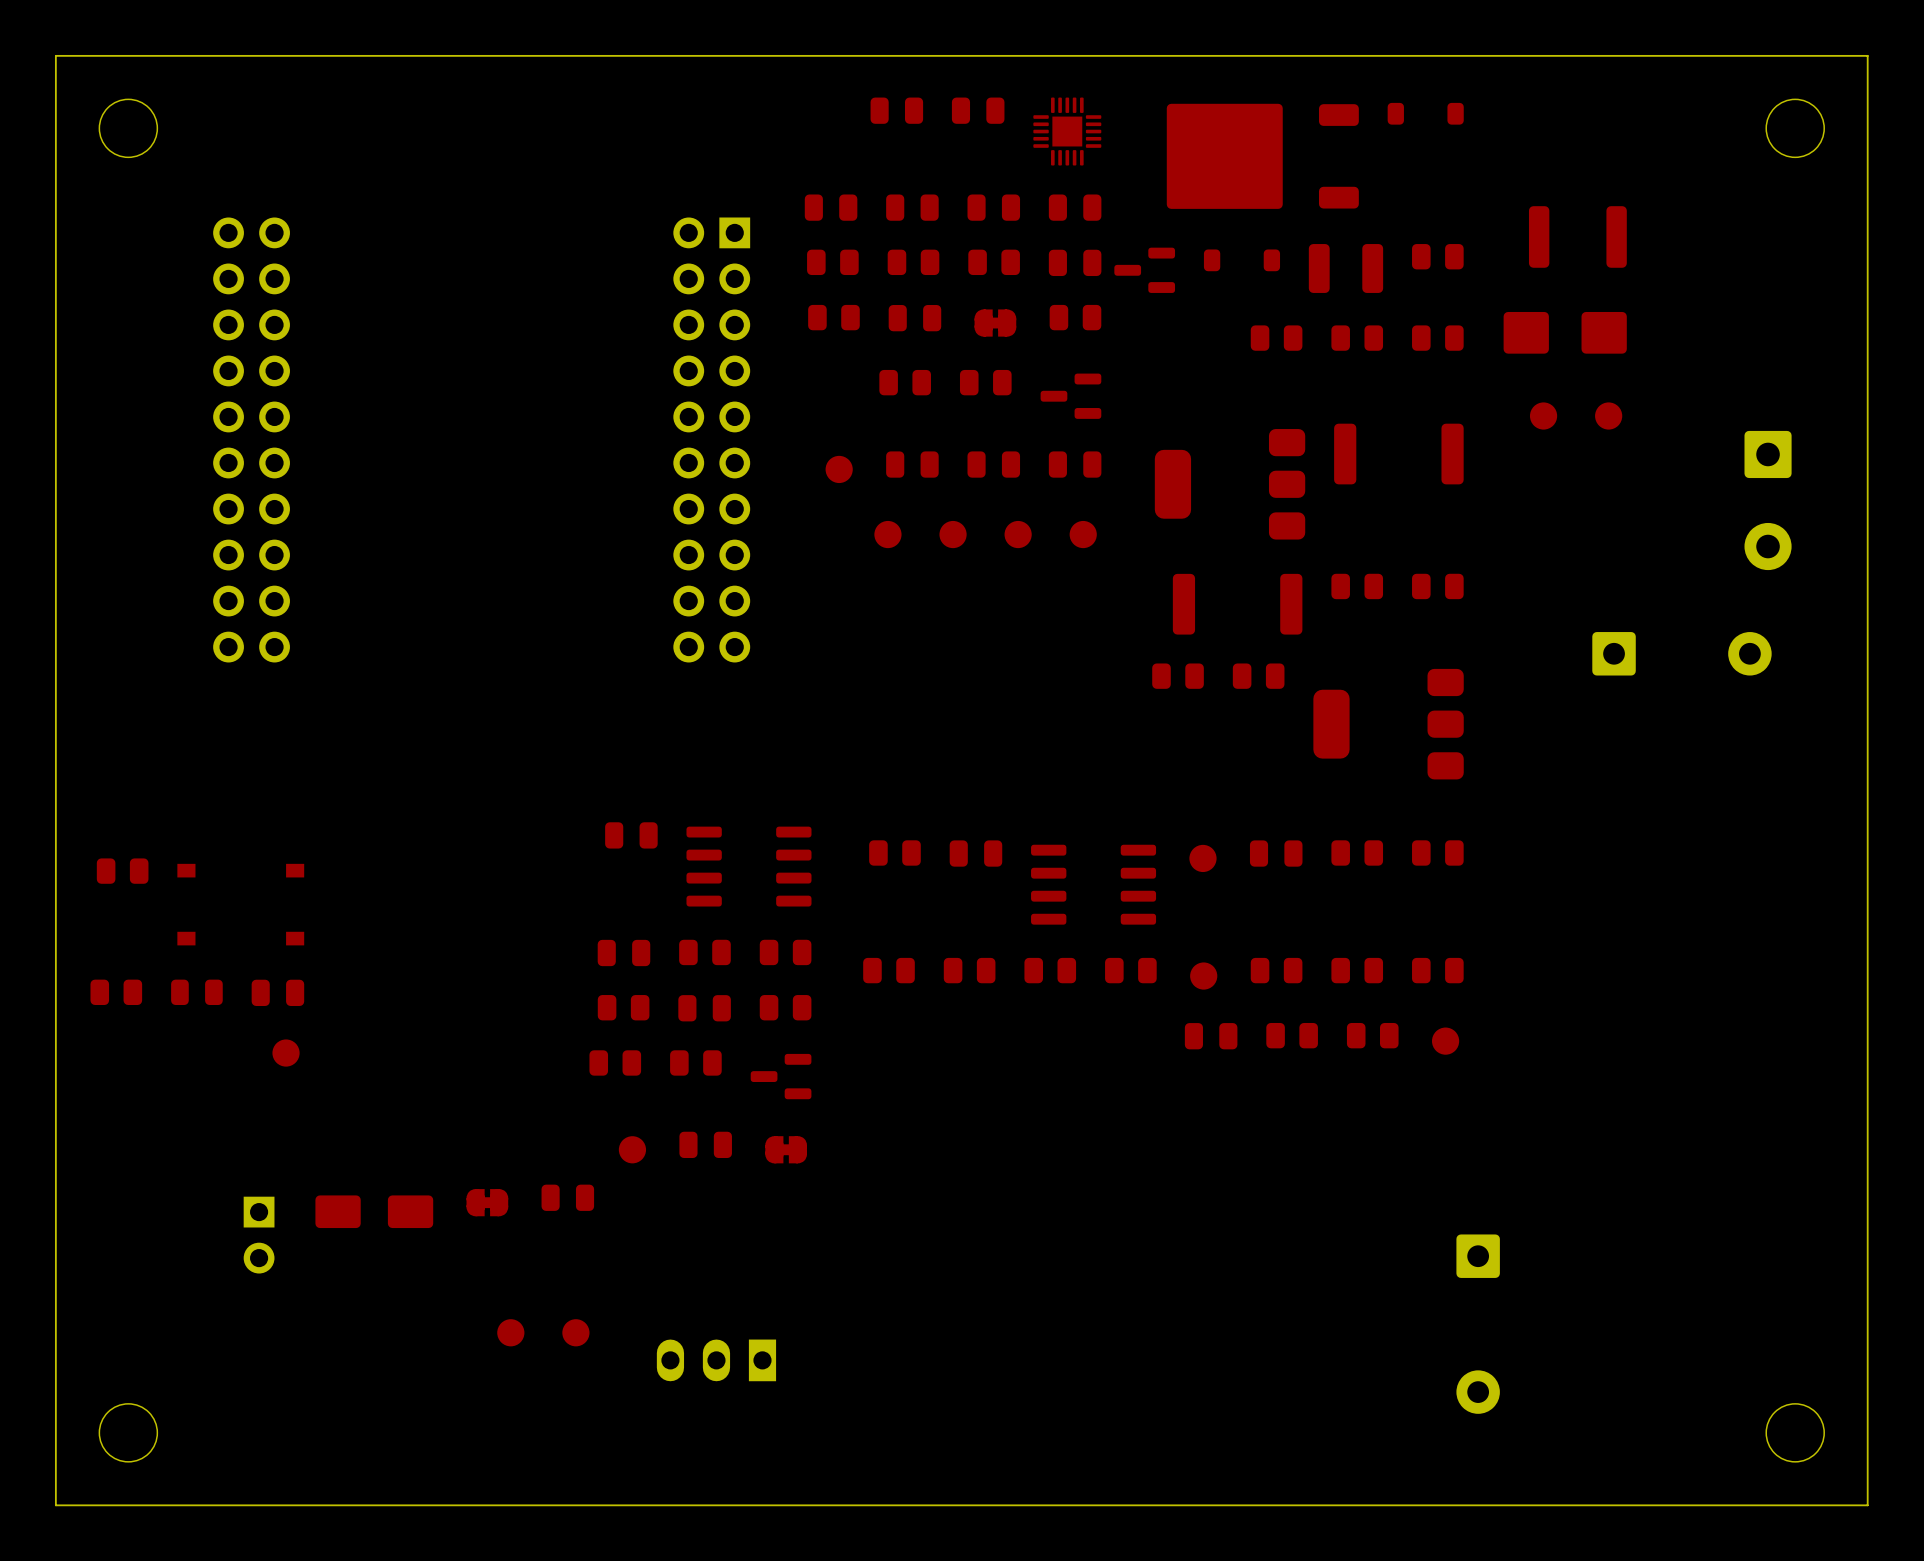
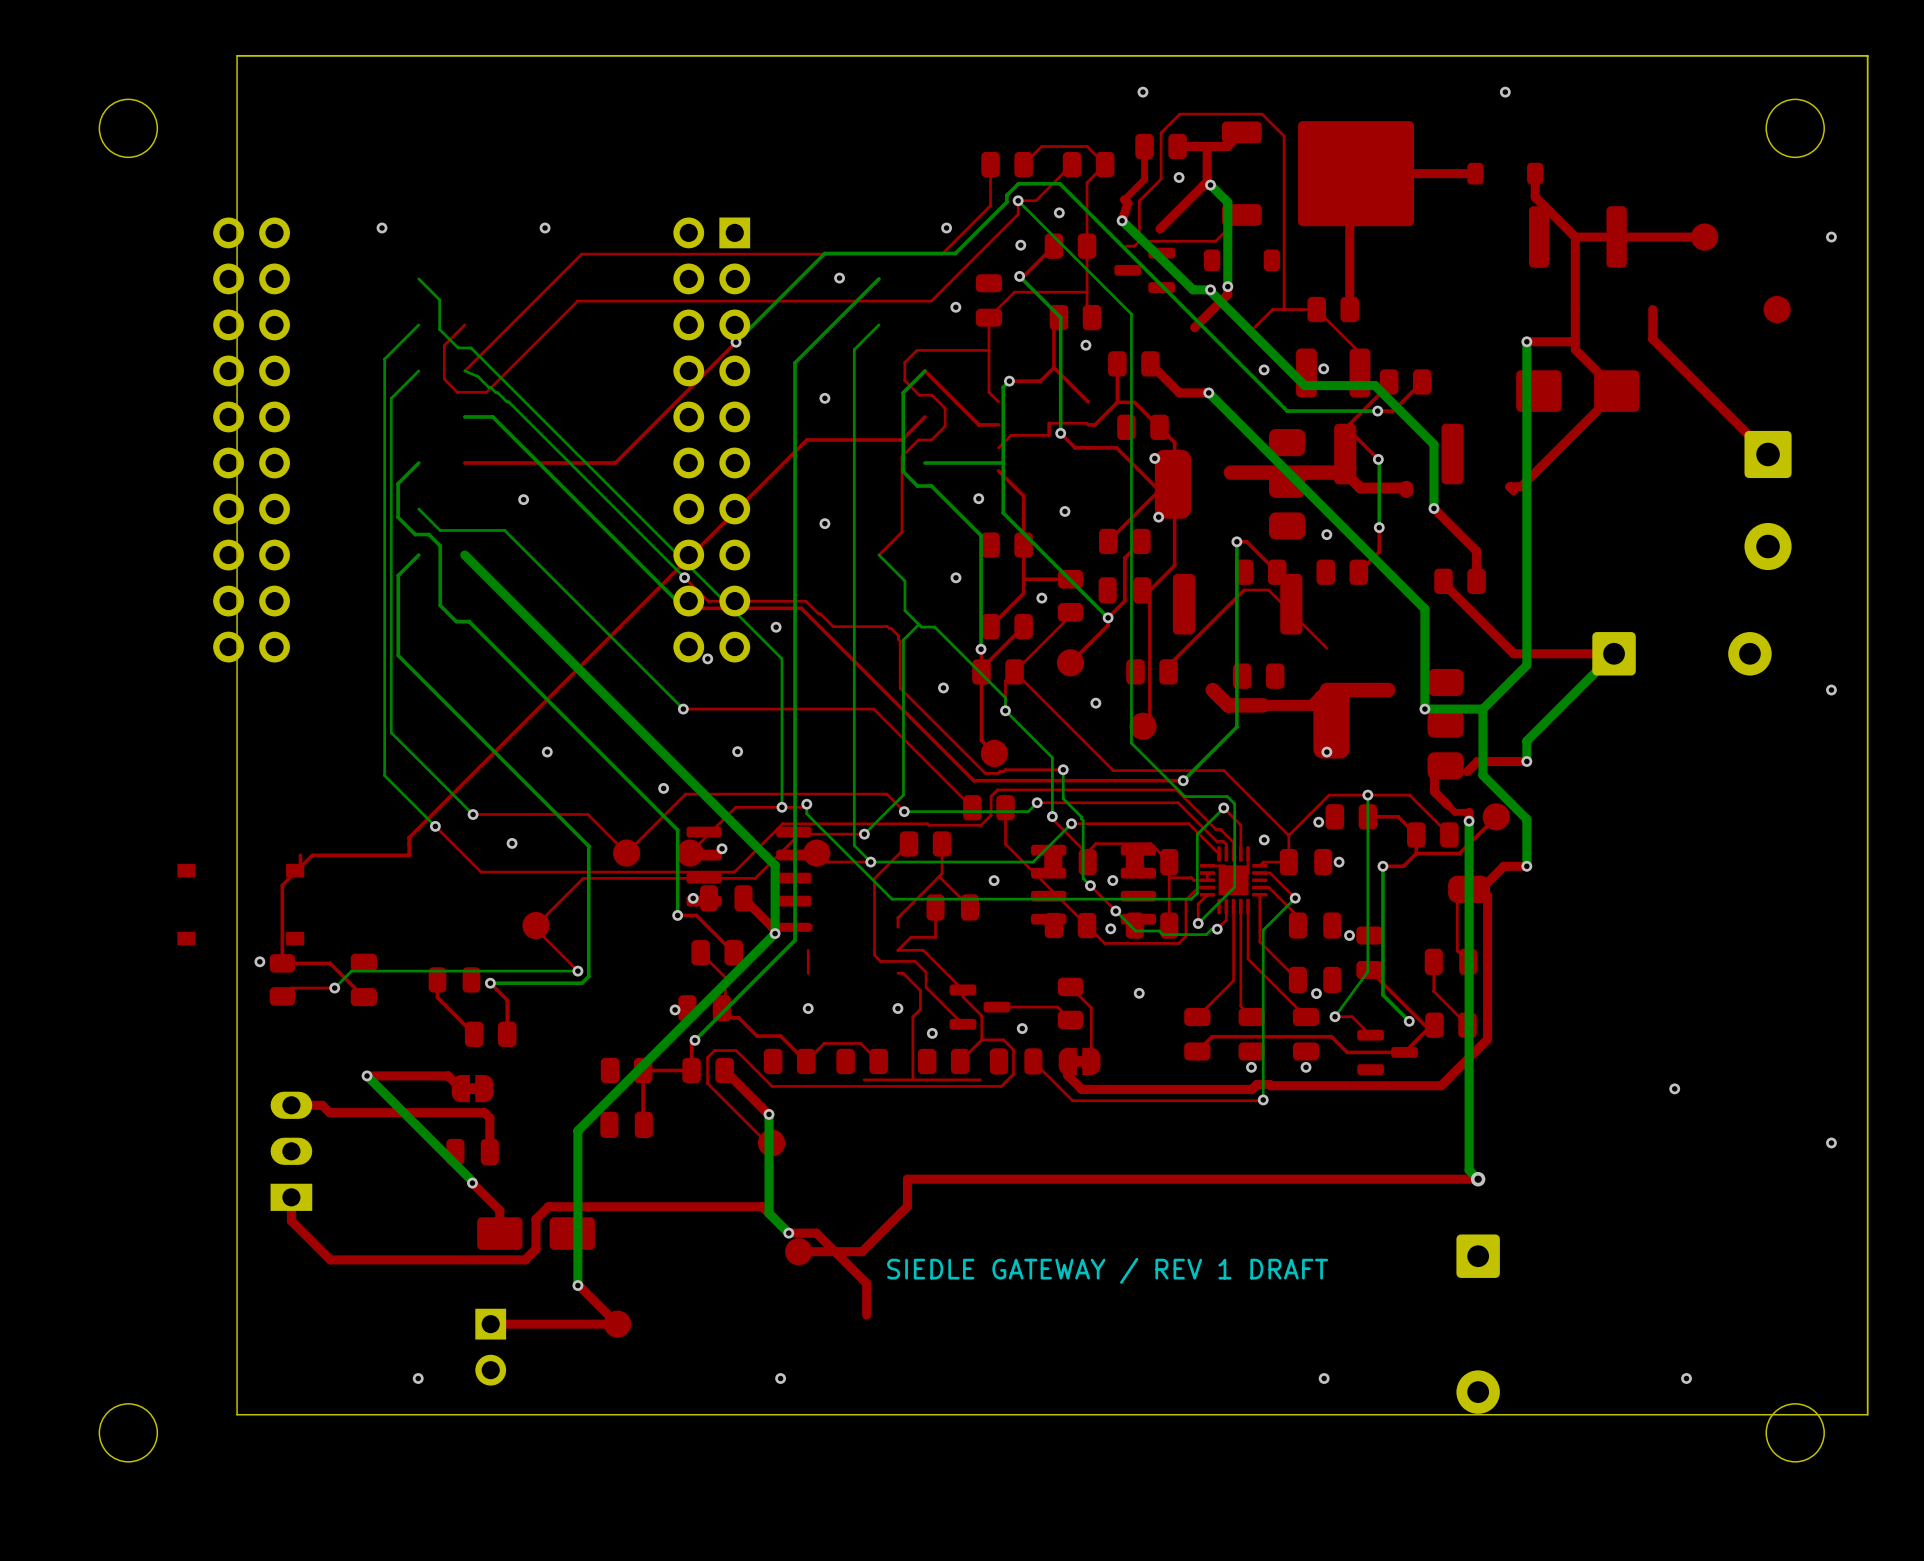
board edge: (237, 55) (55, 55) (55, 1505) (1867, 1505) (1867, 1414) -> (237, 55) (237, 1414) (1867, 1414)
via: none -> (1142, 92)
via: none -> (1505, 92)
part: (896, 110) -> none
part: (978, 110) -> none
part position: (1425, 113) -> (1505, 173)
part: (1067, 131) -> none
top track: none -> (1241, 132) (1227, 146) (1177, 146)
top track: none -> (1144, 146) (1144, 179) (1124, 199) (1127, 203) (1122, 220)
part: none -> (1161, 146)
top track: none -> (1207, 146) (1207, 185)
part rotation: 0° (1262, 156) -> 180° (1317, 173)
top track: none -> (990, 164) (990, 205) (942, 254) (581, 254) (464, 370)
part: none -> (1007, 164)
top track: none -> (1023, 164) (1041, 146) (1087, 146) (1105, 164) (1087, 182) (1087, 309)
top track: none -> (1072, 164) (1035, 200) (1018, 200) (1018, 214) (931, 301) (577, 301) (486, 392) (457, 392) (444, 379) (444, 345) (464, 324)
part: none -> (1088, 164)
top track: none -> (1475, 173) (1356, 173) (1349, 179) (1349, 309)
top track: none -> (1535, 173) (1535, 196) (1575, 237)
via: none -> (1179, 177)
top track: none -> (1210, 185) (1203, 185) (1159, 228)
bottom track: none -> (1210, 185) (1227, 202) (1227, 286)
via: none -> (1210, 185)
bottom track: none -> (1018, 200) (1131, 314) (1131, 743) (1184, 796) (1227, 796) (1234, 803) (1234, 887) (1198, 923)
via: none -> (1018, 200)
part: (831, 207) -> none
part: (912, 207) -> none
part: (993, 207) -> none
part: (1075, 207) -> none
via: none -> (1059, 212)
top track: none -> (1241, 214) (1215, 241) (1139, 241)
bottom track: none -> (1122, 220) (1193, 289) (1210, 289) (1304, 385) (1375, 385) (1433, 444) (1433, 508)
via: none -> (1122, 220)
via: none -> (382, 228)
via: none -> (545, 228)
via: none -> (946, 228)
top track: none -> (1575, 237) (1575, 349) (1616, 391) (1521, 486) (1509, 486) (1513, 490)
top track: none -> (1704, 237) (1575, 237)
part: none -> (1704, 237)
via: none -> (1831, 237)
top track: none -> (1139, 241) (1139, 200) (1161, 179) (1161, 132) (1179, 114) (1262, 114) (1284, 136) (1284, 309)
top track: none -> (1139, 241) (1134, 246) (1125, 246)
via: none -> (1020, 245)
top track: none -> (1053, 246) (1023, 276) (1019, 276)
part footprint: [1048, 249, 1102, 277] -> [1044, 233, 1097, 259]
part: (1437, 256) -> none
part: (832, 262) -> none
part: (913, 262) -> none
part: (994, 262) -> none
part position: (1345, 268) -> (1333, 372)
bottom track: none -> (1019, 276) (1060, 317) (1060, 433)
via: none -> (1019, 276)
bottom track: none -> (418, 278) (439, 299) (439, 329) (458, 347) (471, 347) (781, 658) (781, 807)
via: none -> (839, 278)
bottom track: none -> (878, 278) (795, 362) (795, 940) (694, 1040)
top track: none -> (1227, 286) (1227, 294) (1194, 327)
via: none -> (1227, 286)
via: none -> (1210, 289)
top track: none -> (1087, 292) (1014, 292) (988, 317) (988, 392) (998, 401)
part: none -> (988, 300)
via: none -> (955, 307)
top track: none -> (1053, 309) (1053, 367)
part: none -> (1333, 309)
top track: none -> (1652, 309) (1652, 339) (1768, 454)
part: none -> (1777, 309)
part: (833, 317) -> none
part: (914, 318) -> none
part: (995, 323) -> none
bottom track: none -> (418, 324) (384, 359) (384, 775) (435, 826)
bottom track: none -> (878, 324) (854, 349) (854, 845) (870, 862) (1033, 862) (1071, 823)
top track: none -> (1254, 327) (1272, 309) (1316, 309) (1359, 352) (1359, 372)
part position: (1565, 332) -> (1577, 391)
part: (1276, 338) -> none
part: (1357, 338) -> none
part: (1437, 338) -> none
bottom track: none -> (1526, 341) (1526, 665) (1482, 709)
via: none -> (1526, 341)
top track: none -> (1575, 341) (1526, 341)
top track: none -> (736, 342) (615, 462) (464, 462)
bottom track: none -> (736, 342) (824, 253) (955, 253) (1006, 202) (1006, 195) (1018, 183) (1059, 183) (1287, 411) (1377, 411)
via: none -> (736, 342)
via: none -> (1085, 345)
top track: none -> (988, 350) (916, 350) (904, 362) (904, 380) (919, 395) (931, 395) (945, 408) (945, 426) (931, 439) (918, 439) (901, 456) (901, 532) (878, 555)
top track: none -> (1117, 363) (1117, 402)
part: none -> (1133, 363)
top track: none -> (1150, 363) (1179, 392) (1208, 392)
top track: none -> (1053, 367) (1088, 401)
top track: none -> (1053, 367) (1040, 381) (1009, 381)
via: none -> (1323, 368)
via: none -> (1264, 369)
bottom track: none -> (418, 370) (391, 398) (391, 732) (473, 814)
bottom track: none -> (464, 370) (478, 376) (508, 401) (684, 577)
top track: none -> (925, 370) (978, 424) (998, 424)
bottom track: none -> (925, 370) (903, 392) (903, 471) (917, 486) (931, 486) (981, 535) (981, 649)
bottom track: none -> (1009, 381) (1003, 387) (1003, 512) (1108, 617)
via: none -> (1009, 381)
part: (905, 382) -> none
part: (985, 382) -> none
top track: none -> (1389, 382) (1389, 384) (1344, 428) (1344, 430) (1349, 430) (1378, 459)
part: none -> (1405, 382)
top track: none -> (1422, 382) (1393, 411) (1377, 411)
bottom track: none -> (1208, 392) (1424, 609) (1424, 709) (1482, 709)
via: none -> (1208, 392)
part: (1070, 396) -> none
via: none -> (824, 398)
top track: none -> (1117, 402) (1094, 424) (1049, 423) (1049, 435) (1010, 435) (998, 447)
top track: none -> (1117, 402) (1134, 402) (1174, 442) (1174, 565) (1149, 590)
via: none -> (1377, 411)
bottom track: none -> (464, 416) (492, 416) (684, 608)
top track: none -> (925, 416) (901, 439) (806, 439) (409, 837) (409, 855) (312, 855) (300, 867)
part: (1543, 416) -> none
part: (1608, 416) -> none
part: none -> (1142, 427)
top track: none -> (1060, 433) (1075, 447) (1116, 447) (1159, 490) (1108, 541)
via: none -> (1060, 433)
via: none -> (1154, 458)
bottom track: none -> (1378, 459) (1379, 527)
via: none -> (1378, 459)
bottom track: none -> (418, 462) (398, 483) (398, 517) (415, 534) (428, 534) (440, 545) (440, 605) (456, 621) (469, 621) (677, 830) (677, 915)
bottom track: none -> (1003, 462) (925, 462)
part: (912, 464) -> none
part: (993, 464) -> none
part: (1075, 464) -> none
part: (839, 469) -> none
top track: none -> (998, 470) (1023, 496) (1023, 593) (990, 626)
top track: none -> (1230, 472) (1344, 472) (1360, 487) (1406, 487) (1406, 490)
via: none -> (978, 498)
via: none -> (523, 499)
top track: none -> (1433, 508) (1476, 551) (1476, 581)
via: none -> (1433, 508)
bottom track: none -> (418, 509) (440, 530) (504, 530) (683, 709)
via: none -> (1064, 511)
via: none -> (1158, 517)
part footprint: [1004, 520, 1032, 549] -> [981, 532, 1033, 558]
via: none -> (824, 523)
top track: none -> (1379, 527) (1379, 551) (1358, 572)
via: none -> (1379, 527)
part: (887, 534) -> none
part: (953, 534) -> none
part: (1083, 534) -> none
via: none -> (1326, 534)
part: none -> (1124, 541)
top track: none -> (1141, 541) (1124, 557) (1124, 601) (1108, 617) (1108, 625) (1070, 662)
top track: none -> (1236, 541) (1246, 541) (1277, 572)
bottom track: none -> (1236, 541) (1236, 727) (1183, 780)
via: none -> (1236, 541)
bottom track: none -> (418, 555) (398, 575) (398, 655) (588, 846) (588, 976) (581, 983) (490, 983)
bottom track: none -> (464, 555) (775, 865) (775, 933) (577, 1130) (577, 1285)
bottom track: none -> (878, 555) (904, 581) (904, 610) (918, 624)
part: none -> (1260, 572)
top track: none -> (684, 577) (708, 601) (805, 601) (833, 626) (887, 626) (891, 628) (898, 635) (900, 641) (900, 688) (985, 773) (998, 773) (1005, 769) (1063, 769)
via: none -> (684, 577)
via: none -> (955, 577)
top track: none -> (1070, 579) (1023, 579)
top track: none -> (1443, 581) (1513, 653) (1614, 653)
part position: (1357, 586) -> (1342, 572)
part position: (1437, 586) -> (1460, 581)
part: none -> (1124, 590)
top track: none -> (1149, 590) (1149, 719) (1142, 726)
part: none -> (1070, 595)
via: none -> (1041, 598)
top track: none -> (684, 608) (801, 608) (973, 780) (1183, 780)
top track: none -> (1070, 612) (1070, 615) (1005, 680) (1005, 710)
via: none -> (1108, 617)
bottom track: none -> (918, 624) (903, 639) (903, 795) (864, 834)
bottom track: none -> (918, 624) (921, 627) (934, 627) (1005, 697) (1005, 710) (1052, 757) (1052, 816)
part: none -> (1007, 626)
top track: none -> (1023, 626) (981, 668)
via: none -> (776, 627)
top track: none -> (1326, 648) (1268, 590) (1244, 590) (1168, 665) (1168, 671)
top track: none -> (981, 649) (981, 740) (994, 753)
via: none -> (981, 649)
bottom track: none -> (1614, 653) (1526, 740) (1526, 761)
via: none -> (707, 658)
part: none -> (1070, 662)
part: none -> (998, 671)
top track: none -> (1014, 671) (1113, 770) (1223, 770) (1288, 835)
part position: (1178, 676) -> (1152, 671)
via: none -> (943, 687)
top track: none -> (1388, 690) (1326, 690) (1311, 705) (1228, 705) (1212, 690)
via: none -> (1831, 690)
via: none -> (1095, 703)
top track: none -> (683, 709) (873, 709) (972, 807)
via: none -> (683, 709)
via: none -> (1424, 709)
bottom track: none -> (1482, 709) (1482, 775) (1526, 819) (1526, 866)
via: none -> (1005, 710)
part: none -> (1142, 726)
via: none -> (737, 751)
via: none -> (547, 752)
via: none -> (1326, 752)
part: none -> (994, 753)
top track: none -> (1526, 761) (1477, 761) (1467, 771)
via: none -> (1526, 761)
bottom track: none -> (1063, 769) (1063, 798) (1083, 820) (1083, 878) (1090, 885)
via: none -> (1063, 769)
top track: none -> (1434, 771) (1434, 791) (1455, 812) (1469, 812) (1469, 821)
via: none -> (1183, 780)
via: none -> (663, 788)
bottom track: none -> (1367, 795) (1367, 971) (1335, 1016)
via: none -> (1367, 795)
top track: none -> (1037, 802) (1178, 802) (1216, 841) (1223, 841) (1226, 844) (1226, 853)
bottom track: none -> (1037, 802) (1028, 811) (904, 811)
via: none -> (1037, 802)
top track: none -> (806, 804) (803, 807) (735, 807) (690, 853)
bottom track: none -> (806, 804) (806, 813) (892, 899) (1191, 899) (1197, 893) (1197, 834) (1223, 807)
via: none -> (806, 804)
via: none -> (781, 807)
part: none -> (988, 807)
top track: none -> (1005, 807) (1005, 844) (1104, 943) (1178, 943) (1185, 936) (1185, 899) (1198, 887) (1207, 887)
top track: none -> (1223, 807) (1240, 825) (1240, 853)
via: none -> (1223, 807)
top track: none -> (904, 811) (886, 794) (685, 794) (626, 853) (588, 814) (473, 814)
via: none -> (904, 811)
via: none -> (473, 814)
top track: none -> (1052, 816) (1052, 818) (1085, 851) (1087, 851)
via: none -> (1052, 816)
top track: none -> (1367, 816) (1398, 816) (1416, 834) (1416, 853)
top track: none -> (1496, 816) (1459, 853) (1416, 853)
part: none -> (1496, 816)
bottom track: none -> (1469, 821) (1469, 1170) (1478, 1179)
via: none -> (1469, 821)
via: none -> (1318, 822)
top track: none -> (1071, 823) (1188, 823) (1219, 853)
via: none -> (1071, 823)
top track: none -> (435, 826) (481, 872) (734, 872) (782, 823) (981, 825) (991, 815) (991, 796) (997, 789) (1176, 789) (1215, 829) (1220, 829) (1233, 842) (1233, 853)
via: none -> (435, 826)
top track: none -> (864, 834) (799, 834) (755, 878) (583, 878) (536, 925) (536, 929) (577, 971)
via: none -> (864, 834)
top track: none -> (1449, 834) (1409, 795) (1329, 795) (1288, 835)
part: (631, 835) -> none
top track: none -> (1288, 835) (1288, 862) (1263, 862) (1259, 865)
via: none -> (1264, 839)
via: none -> (512, 843)
top track: none -> (909, 844) (874, 878) (874, 955) (880, 961) (915, 961) (926, 972) (926, 987) (962, 1024)
top track: none -> (942, 844) (942, 873) (897, 917) (897, 927)
via: none -> (722, 848)
top track: none -> (1087, 851) (1095, 843) (1150, 843) (1169, 862) (1169, 925)
part position: (894, 852) -> (925, 844)
part position: (1357, 852) -> (1351, 816)
part position: (1437, 852) -> (1432, 834)
part: none -> (626, 853)
part: none -> (690, 853)
top track: none -> (816, 853) (825, 862) (870, 862)
part: none -> (816, 853)
part: (975, 853) -> none
top track: none -> (1248, 853) (1248, 873)
part position: (1276, 853) -> (1306, 862)
top track: none -> (1416, 853) (1403, 866) (1382, 866)
top track: none -> (300, 855) (300, 867)
part: (1202, 858) -> none
via: none -> (870, 862)
part: none -> (1070, 862)
part: none -> (1152, 862)
via: none -> (1339, 862)
top track: none -> (1224, 865) (1207, 865)
bottom track: none -> (1382, 866) (1382, 994) (1409, 1021)
via: none -> (1382, 866)
top track: none -> (1526, 866) (1503, 866) (1480, 889) (1487, 896) (1487, 1039) (1441, 1085) (1256, 1084) (1251, 1089) (1081, 1089) (1067, 1075) (1067, 1061)
via: none -> (1526, 866)
top track: none -> (300, 867) (282, 885) (282, 963) (330, 963) (363, 997)
part: (122, 871) -> none
top track: none -> (1207, 873) (1207, 880) (1169, 877)
top track: none -> (1259, 873) (1270, 873) (1295, 898)
top track: none -> (939, 876) (969, 907)
via: none -> (994, 880)
via: none -> (1112, 880)
part: none -> (1233, 880)
top track: none -> (1090, 885) (1115, 911)
via: none -> (1090, 885)
top track: none -> (1259, 887) (1269, 887) (1297, 916) (1297, 925)
top track: none -> (1457, 889) (1457, 950) (1468, 961)
part: none -> (1469, 889)
top track: none -> (1207, 894) (1198, 903) (1198, 923)
top track: none -> (1259, 894) (1259, 941) (1297, 979)
via: none -> (693, 898)
part: none -> (726, 898)
top track: none -> (743, 898) (772, 927) (808, 927)
bottom track: none -> (1295, 898) (1263, 930) (1263, 1099)
via: none -> (1295, 898)
top track: none -> (1226, 906) (1226, 920) (1217, 929)
top track: none -> (1233, 906) (1233, 980) (1197, 1017)
top track: none -> (1240, 906) (1240, 1006) (1251, 1017)
top track: none -> (1248, 906) (1248, 959) (1306, 1017)
top track: none -> (935, 907) (935, 937) (910, 937) (897, 950) (923, 950) (962, 989) (962, 996) (981, 1015) (981, 1039)
part: none -> (952, 907)
bottom track: none -> (1115, 911) (1135, 930) (1159, 930) (1162, 934) (1206, 934) (1211, 929) (1217, 929)
via: none -> (1115, 911)
top track: none -> (677, 915) (696, 915) (733, 952)
via: none -> (677, 915)
via: none -> (1198, 923)
part: none -> (536, 925)
part: none -> (1070, 925)
part: none -> (1152, 925)
part: none -> (1315, 925)
via: none -> (1110, 928)
via: none -> (1217, 929)
via: none -> (775, 933)
via: none -> (1349, 935)
top track: none -> (808, 950) (808, 973)
top track: none -> (700, 952) (725, 977) (725, 1016) (738, 1017) (757, 1036) (780, 1036) (805, 1061)
part position: (704, 952) -> (717, 952)
part: (785, 952) -> none
part: none -> (1369, 952)
part: (623, 953) -> none
part footprint: [1412, 957, 1464, 984] -> [1424, 948, 1478, 975]
via: none -> (259, 961)
top track: none -> (1433, 961) (1433, 991) (1467, 1025)
top track: none -> (1369, 969) (1428, 1028)
part: (888, 970) -> none
part: (969, 970) -> none
part: (1050, 970) -> none
part: (1130, 970) -> none
part: (1276, 970) -> none
part: (1357, 970) -> none
bottom track: none -> (577, 971) (351, 971) (334, 988)
via: none -> (577, 971)
top track: none -> (897, 973) (903, 973) (920, 990) (920, 1009) (912, 1016) (912, 1079)
part: (1203, 976) -> none
part footprint: [251, 979, 305, 1006] -> [269, 954, 296, 1006]
part: none -> (363, 979)
top track: none -> (437, 979) (437, 997) (474, 1034)
part: none -> (1315, 979)
top track: none -> (490, 983) (507, 1000) (507, 1034)
via: none -> (490, 983)
top track: none -> (1070, 986) (1091, 1007) (1091, 1061)
top track: none -> (334, 988) (290, 988) (282, 996)
via: none -> (334, 988)
part: (116, 992) -> none
part position: (196, 992) -> (454, 979)
via: none -> (1139, 993)
via: none -> (1316, 993)
part: none -> (1070, 1003)
part: (623, 1007) -> none
part: (785, 1007) -> none
part: none -> (979, 1007)
top track: none -> (996, 1007) (1057, 1007) (1070, 1019)
via: none -> (808, 1008)
via: none -> (897, 1008)
via: none -> (675, 1009)
top track: none -> (1335, 1016) (1352, 1016) (1370, 1035)
via: none -> (1335, 1016)
via: none -> (1409, 1021)
part footprint: [1266, 1022, 1318, 1049] -> [1292, 1007, 1320, 1061]
part footprint: [1431, 1027, 1460, 1055] -> [1425, 1012, 1477, 1038]
via: none -> (1022, 1028)
top track: none -> (1428, 1028) (1404, 1052) (1347, 1052) (1331, 1036) (1212, 1036) (1197, 1051)
via: none -> (932, 1033)
part: none -> (490, 1034)
part: none -> (1251, 1034)
part: (1372, 1035) -> none
part rotation: 0° (1211, 1036) -> 90° clockwise (1197, 1034)
top track: none -> (981, 1039) (1003, 1039) (1013, 1049) (1013, 1074) (1001, 1086) (772, 1086) (736, 1050) (714, 1050) (707, 1057) (707, 1083) (767, 1142) (771, 1142)
top track: none -> (981, 1039) (960, 1061)
top track: none -> (694, 1040) (691, 1043) (691, 1070) (643, 1070) (643, 1124)
via: none -> (694, 1040)
part: none -> (1387, 1052)
part: (286, 1053) -> none
part footprint: [750, 1053, 812, 1100] -> [763, 1048, 816, 1075]
part: none -> (862, 1061)
top track: none -> (878, 1061) (860, 1043) (824, 1043) (806, 1061)
part: none -> (943, 1061)
part: none -> (1016, 1061)
top track: none -> (1033, 1061) (1072, 1100) (1263, 1099)
part: none -> (1079, 1061)
part position: (615, 1062) -> (626, 1070)
part position: (695, 1062) -> (708, 1070)
via: none -> (1251, 1067)
via: none -> (1306, 1067)
top track: none -> (724, 1070) (769, 1114)
top track: none -> (367, 1075) (448, 1075) (460, 1088)
bottom track: none -> (367, 1075) (472, 1183)
via: none -> (367, 1075)
top track: none -> (980, 1079) (864, 1079)
via: none -> (1674, 1088)
via: none -> (1263, 1099)
top track: none -> (291, 1105) (322, 1105) (329, 1112) (484, 1112) (489, 1118) (489, 1152)
bottom track: none -> (769, 1114) (769, 1213) (788, 1233)
via: none -> (769, 1114)
part: none -> (626, 1124)
part footprint: [765, 1136, 807, 1164] -> [757, 1129, 786, 1157]
via: none -> (1831, 1142)
part: (705, 1144) -> none
part: (632, 1149) -> none
part: none -> (291, 1151)
part: none -> (472, 1152)
top track: none -> (1478, 1179) (907, 1179) (907, 1206) (862, 1251) (798, 1251)
via: none -> (1478, 1179)
top track: none -> (472, 1183) (499, 1210) (499, 1233)
via: none -> (472, 1183)
top track: none -> (291, 1197) (291, 1220) (330, 1259) (525, 1259) (536, 1248) (536, 1219) (548, 1206) (762, 1206) (788, 1233) (816, 1233) (866, 1283) (866, 1315)
part: (567, 1197) -> none
part position: (487, 1202) -> (472, 1088)
part position: (374, 1211) -> (536, 1233)
via: none -> (788, 1233)
part position: (259, 1235) -> (490, 1347)
part: none -> (798, 1251)
text: none -> SIEDLE GATEWAY / REV 1 DRAFT (1107, 1270)
top track: none -> (577, 1285) (617, 1324) (490, 1324)
via: none -> (577, 1285)
part: (510, 1332) -> none
part position: (575, 1332) -> (617, 1324)
part: (716, 1360) -> none
via: none -> (418, 1378)
via: none -> (780, 1378)
via: none -> (1324, 1378)
via: none -> (1686, 1378)

